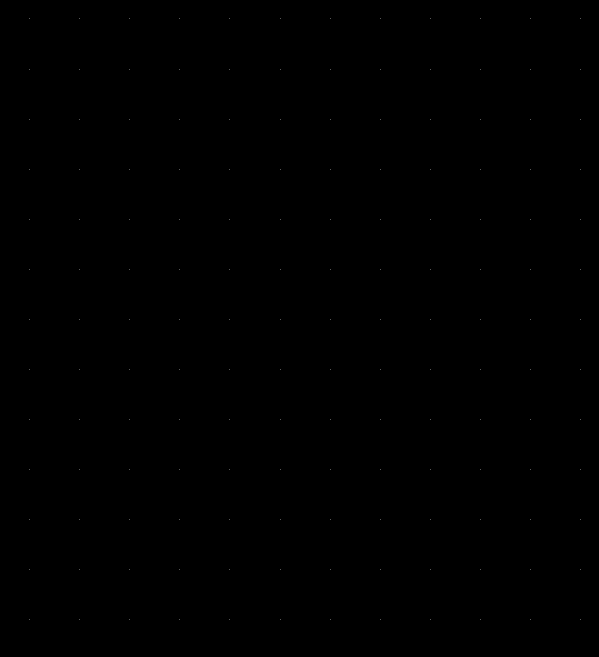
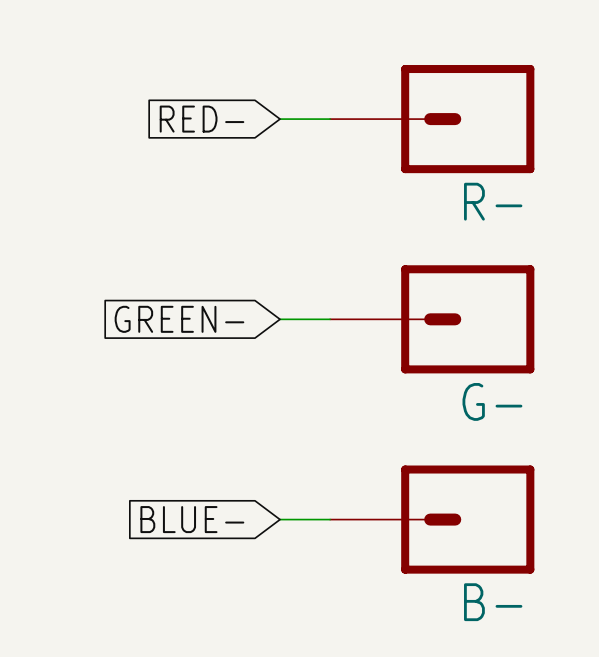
global label: none -> RED- (202, 119)
wire: none -> (280, 119) (330, 119)
R-: none -> (432, 119)
global label: none -> GREEN- (179, 319)
wire: none -> (280, 319) (330, 319)
G-: none -> (432, 319)
global label: none -> BLUE- (192, 519)
wire: none -> (280, 519) (330, 519)
B-: none -> (432, 519)

